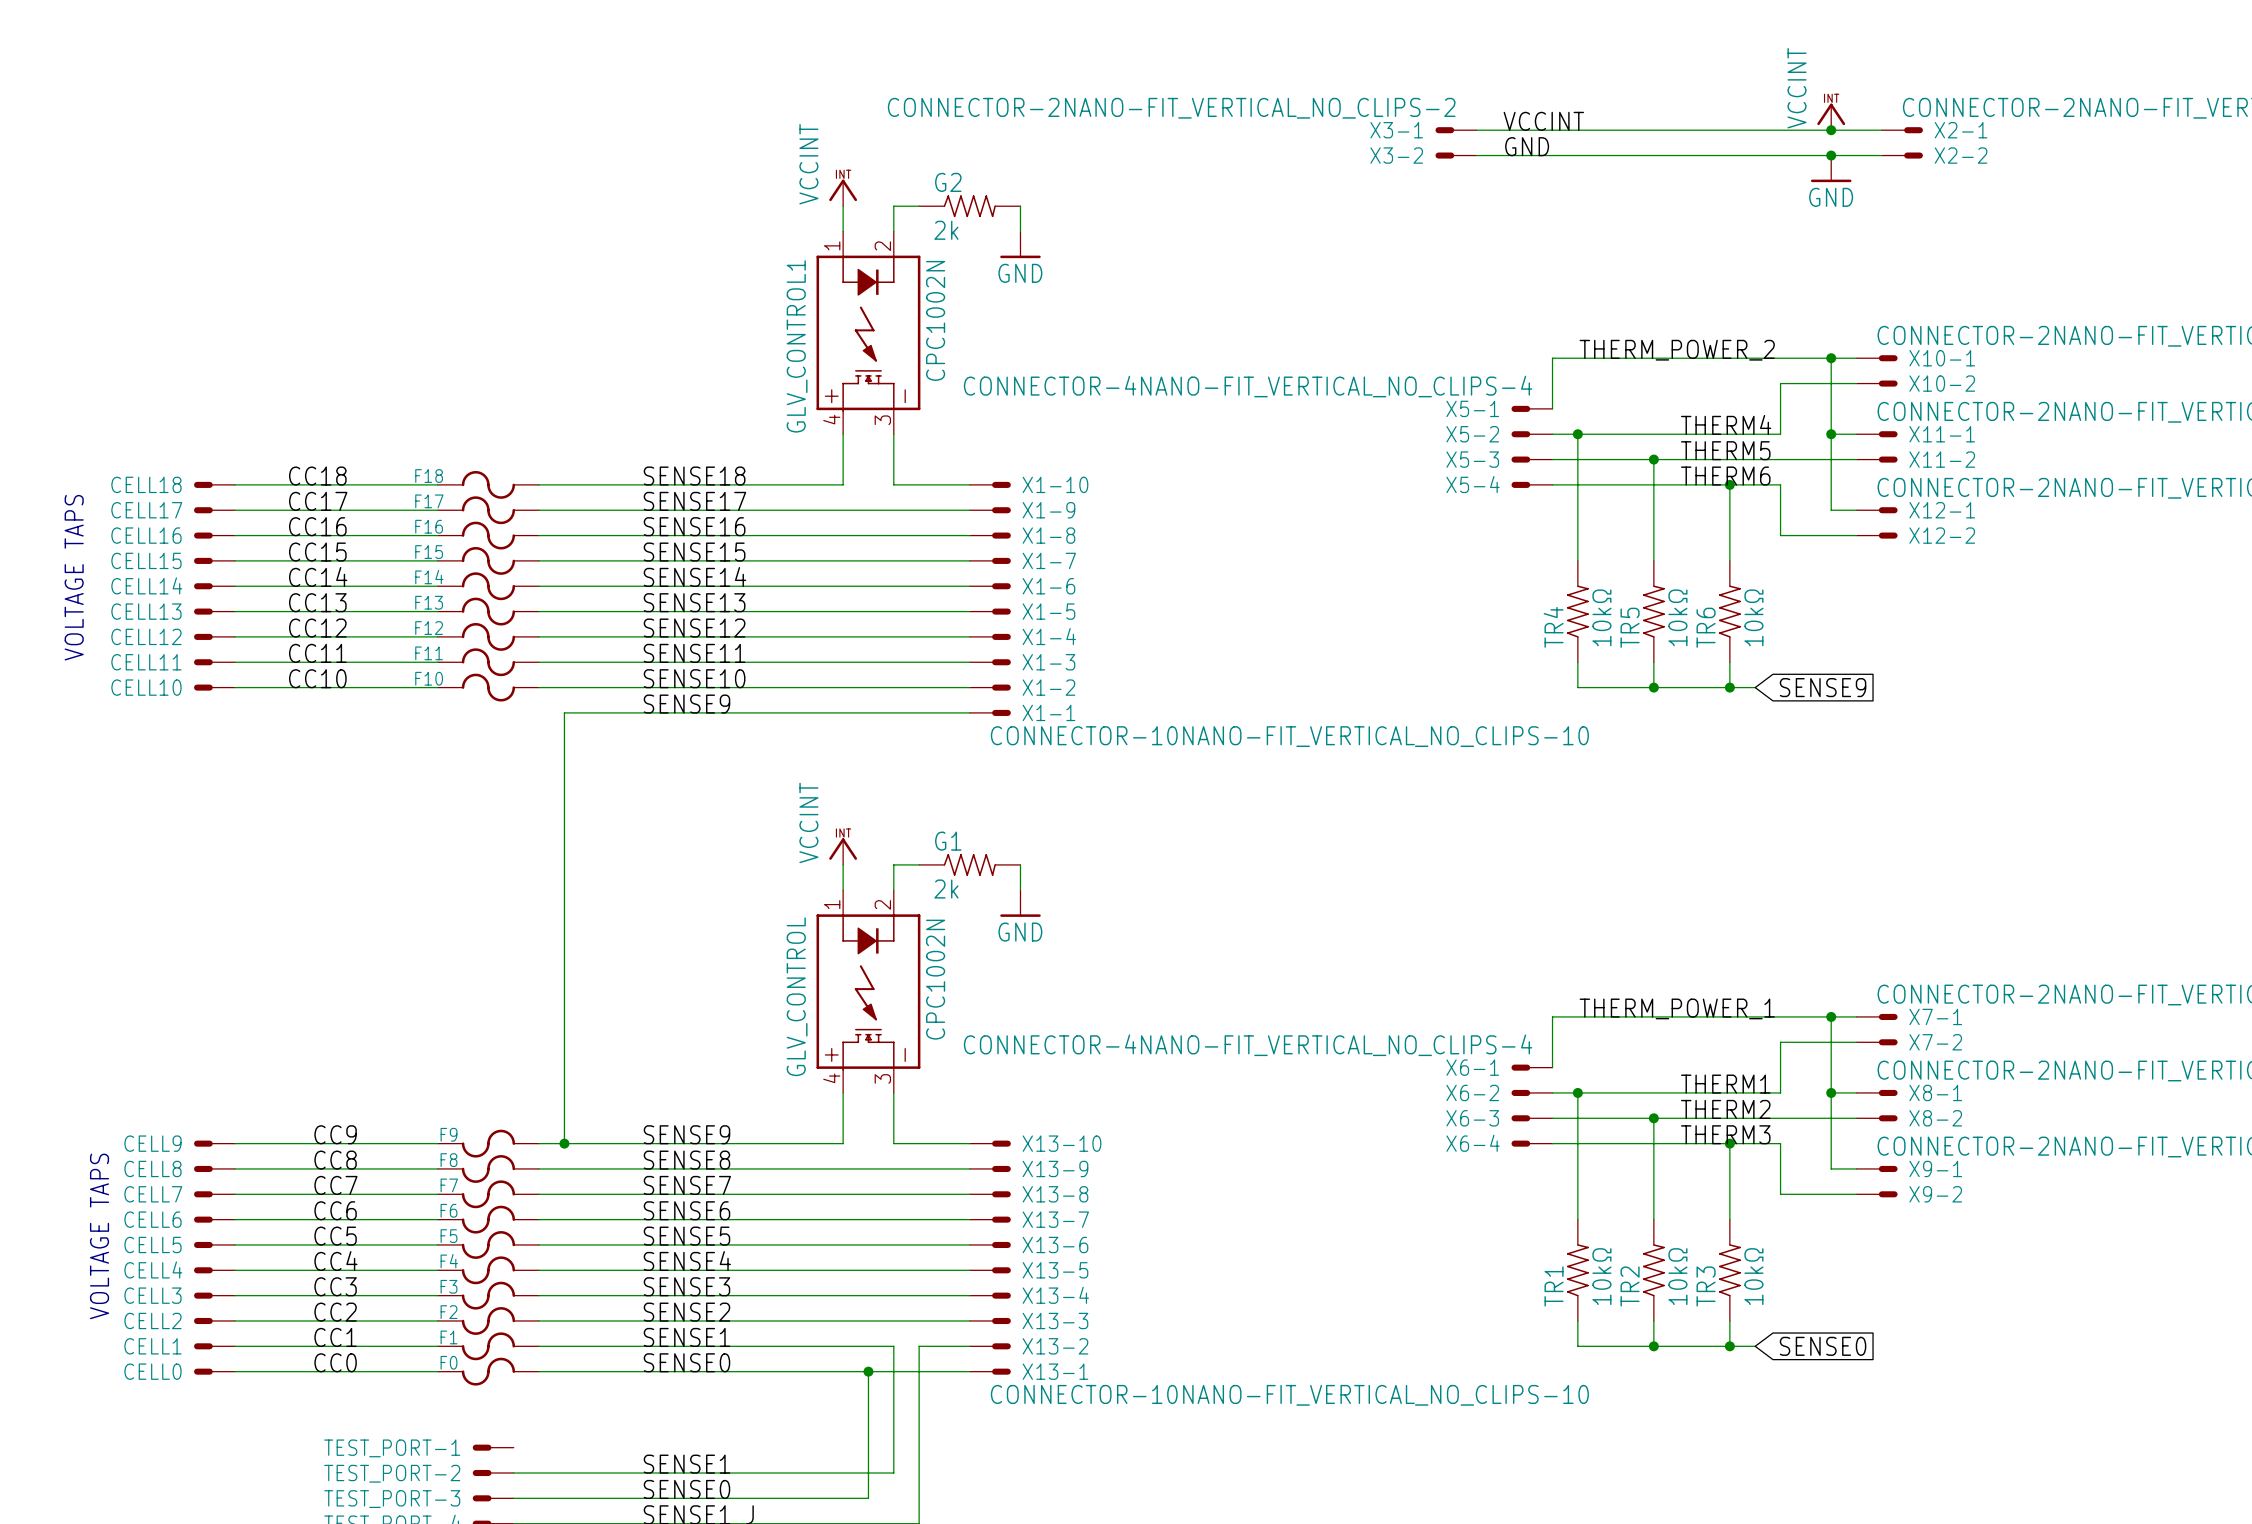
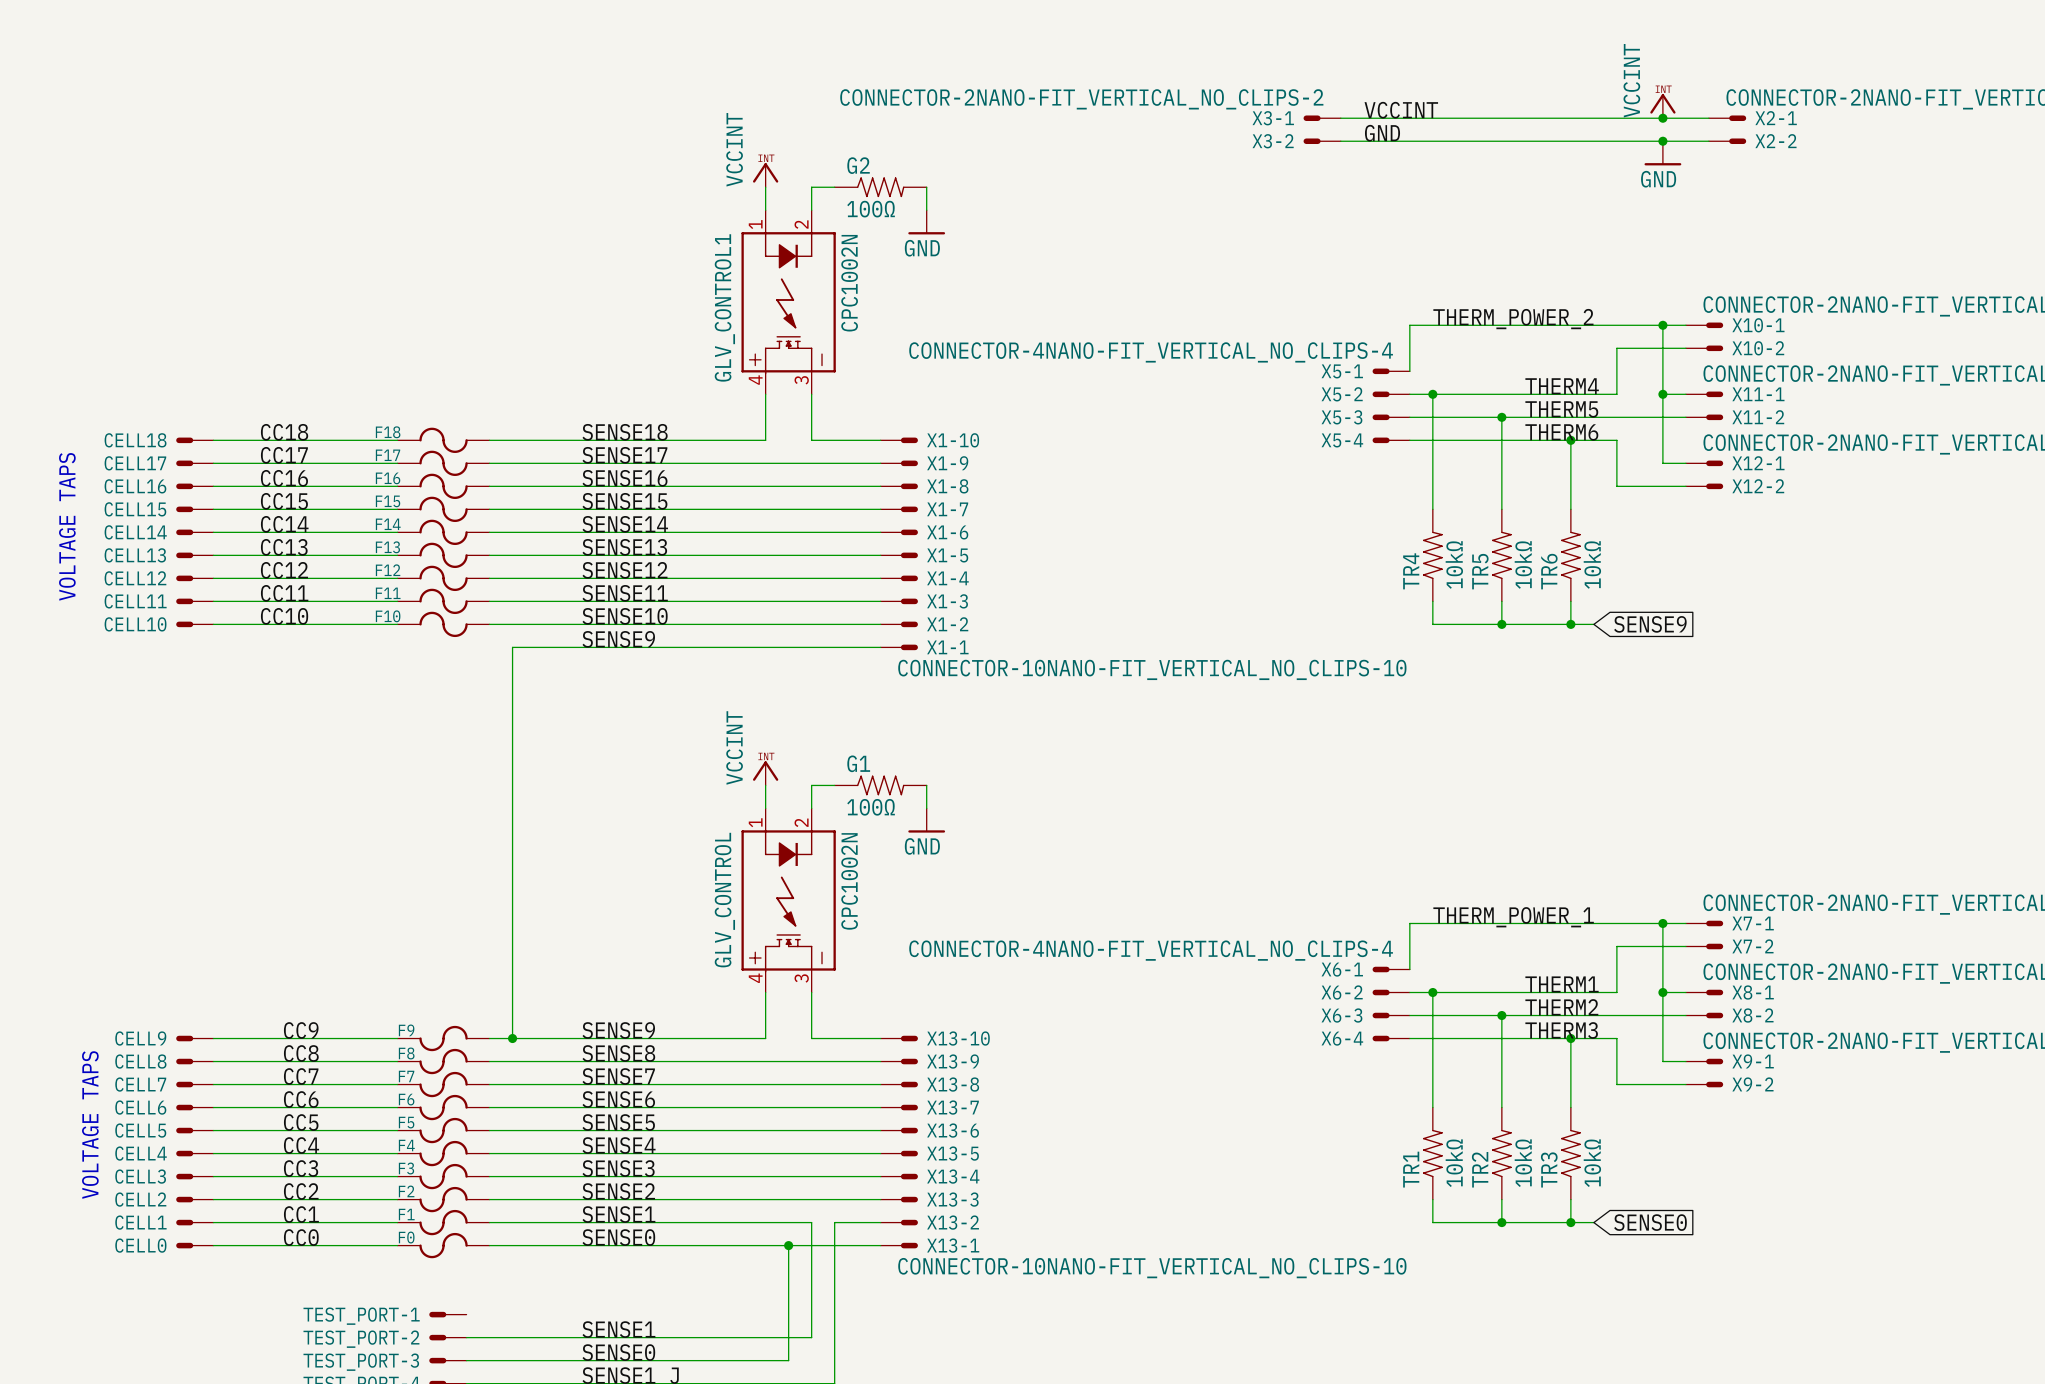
G2 value: 2k (946, 230) -> 100Ω (871, 209)
G1 value: 2k (946, 889) -> 100Ω (871, 807)

